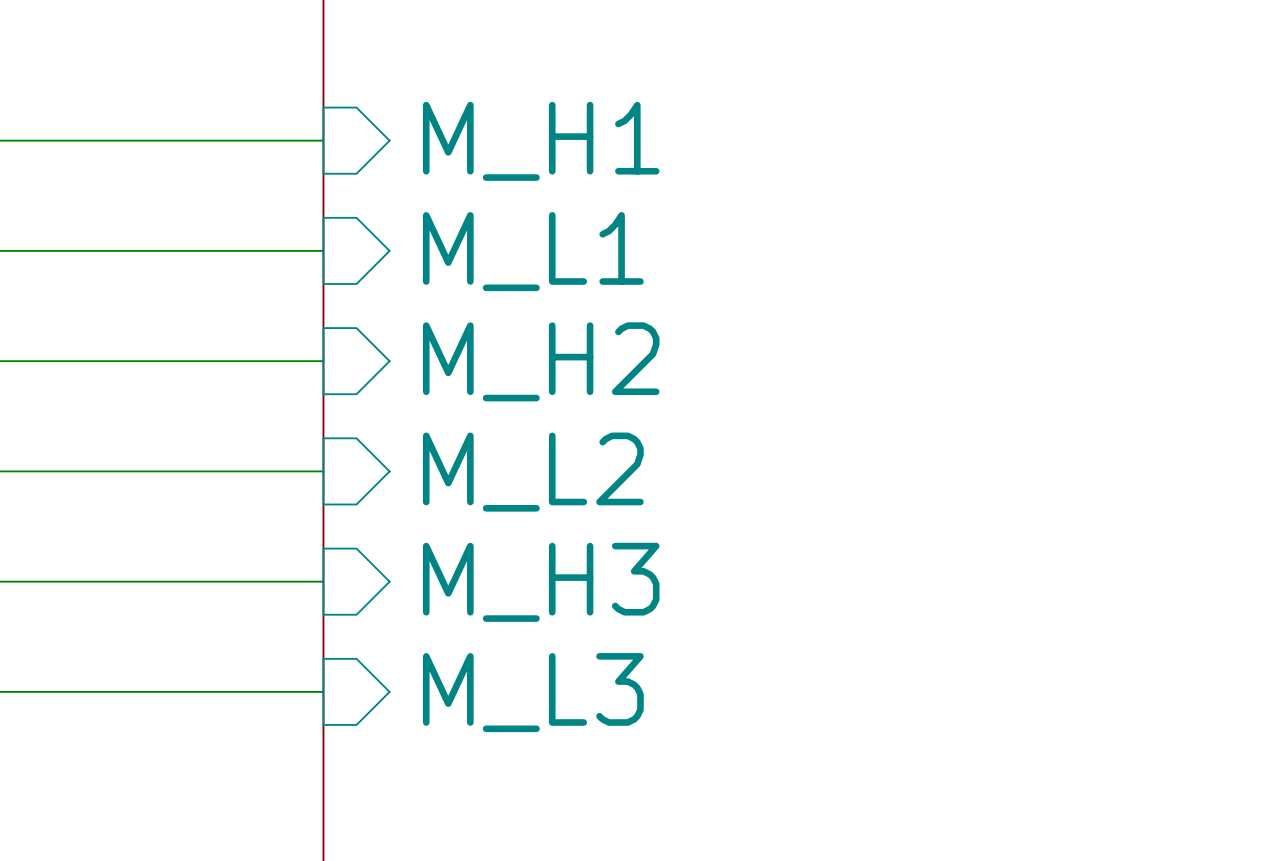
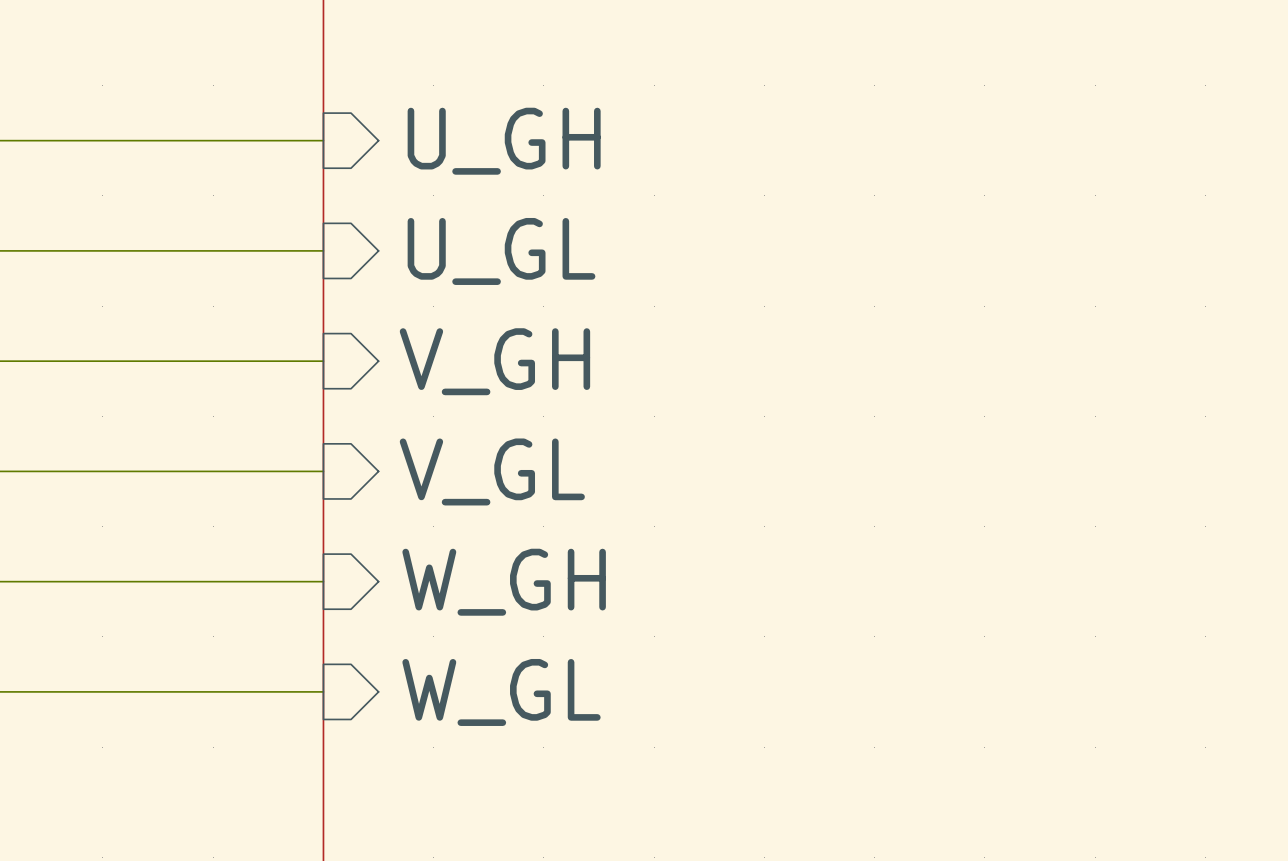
sheet pin: M_H1 (541, 141) -> U_GH (504, 141)
sheet pin: M_L1 (533, 251) -> U_GL (501, 251)
sheet pin: M_H2 (541, 361) -> V_GH (494, 361)
sheet pin: M_L2 (533, 472) -> V_GL (492, 471)
sheet pin: M_H3 (541, 582) -> W_GH (504, 582)
sheet pin: M_L3 (533, 692) -> W_GL (501, 692)

